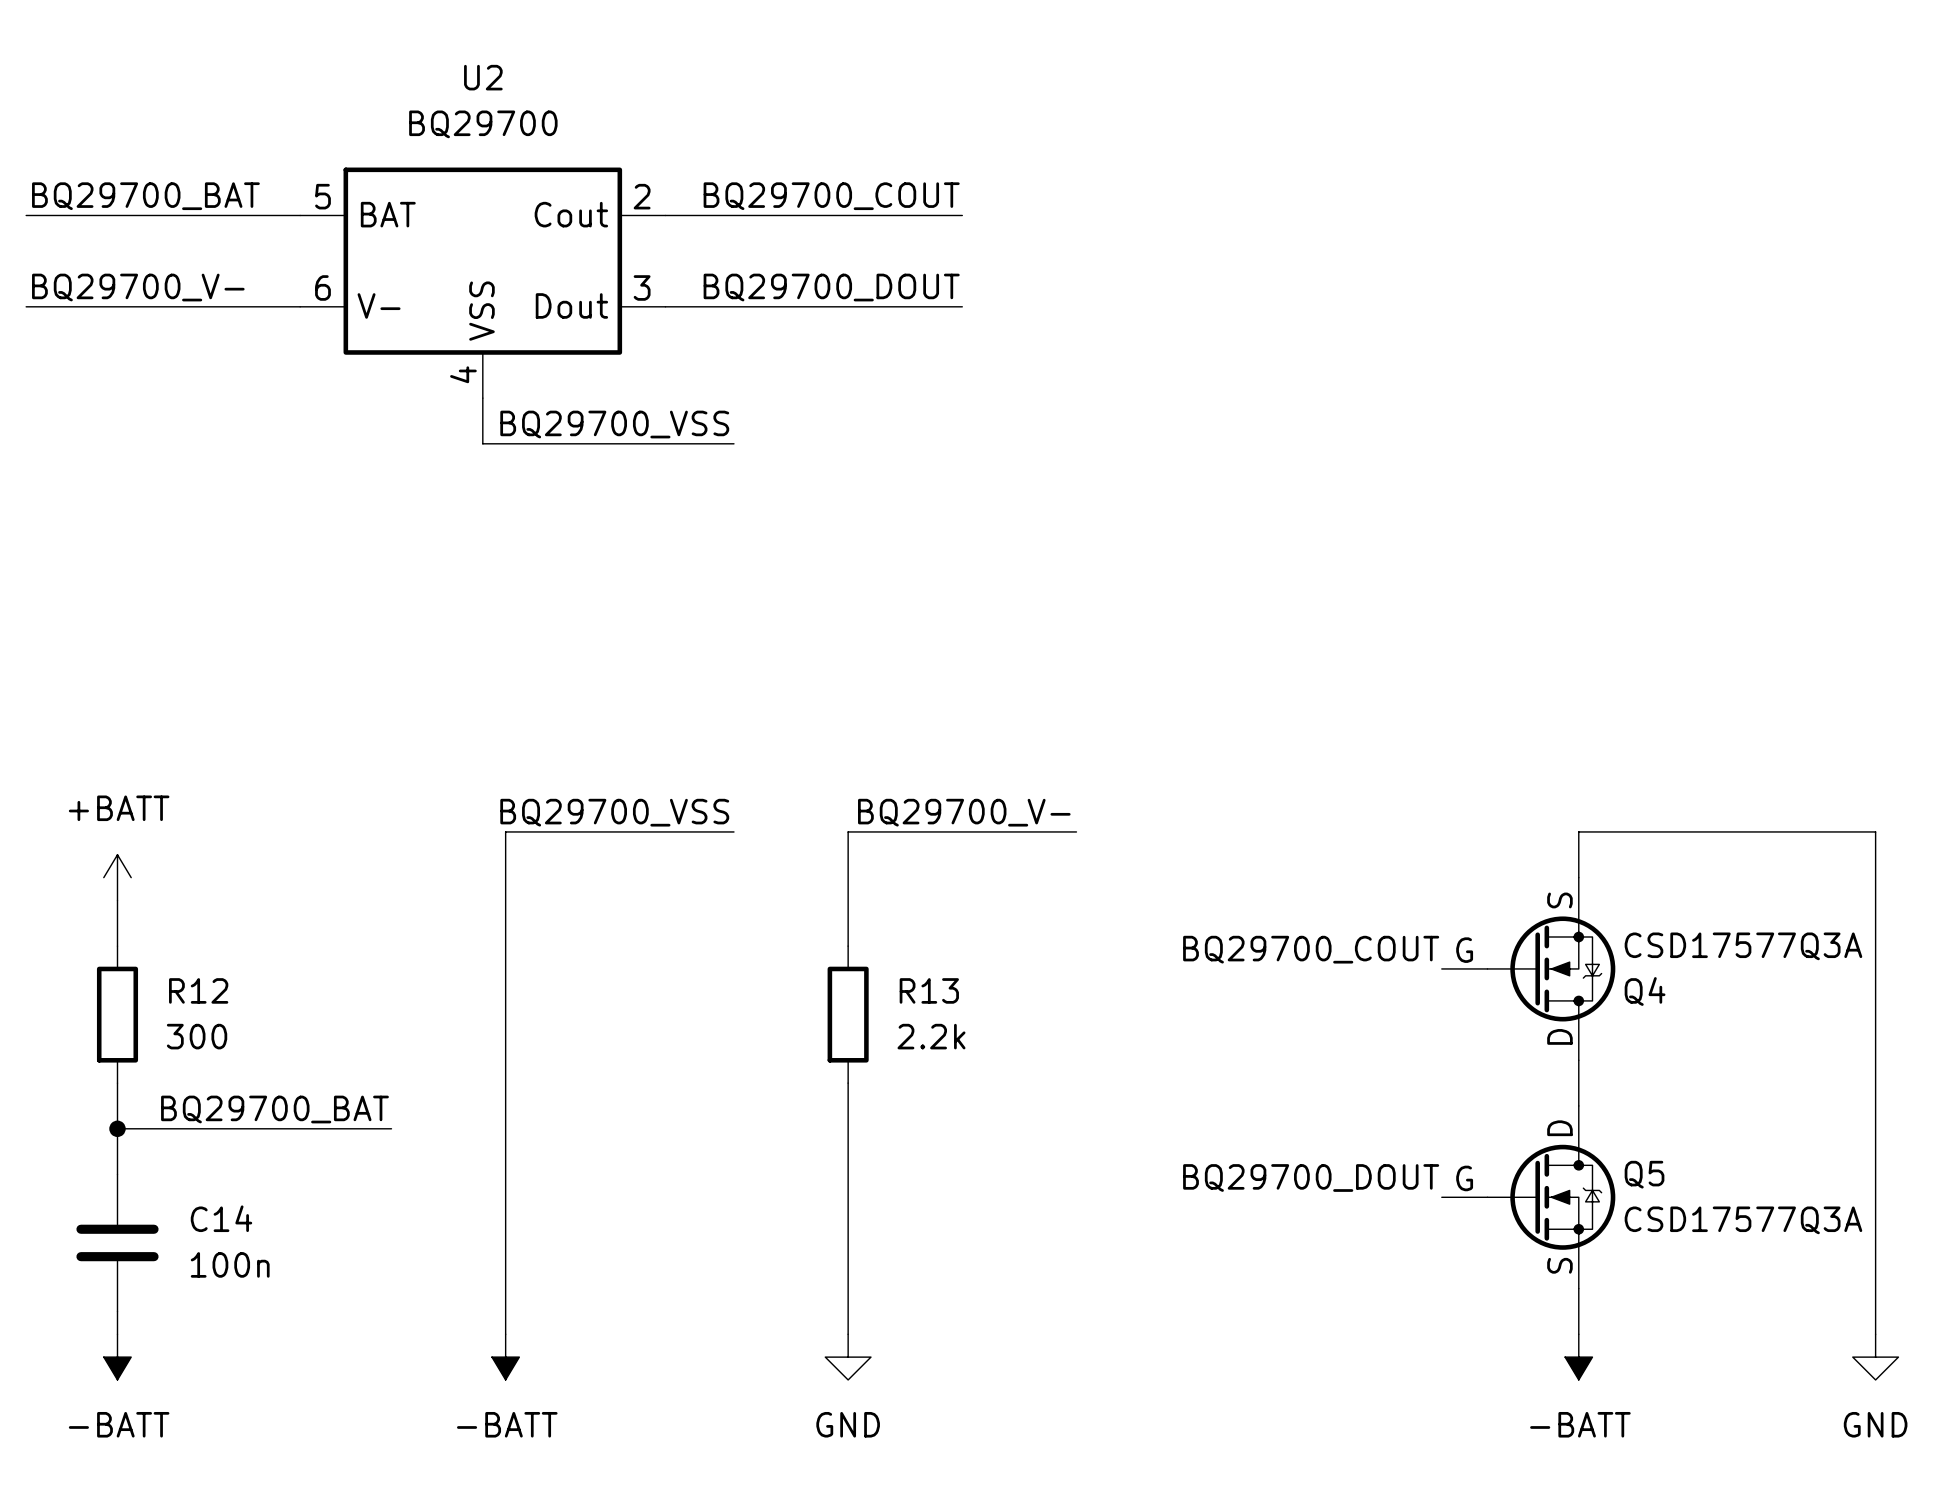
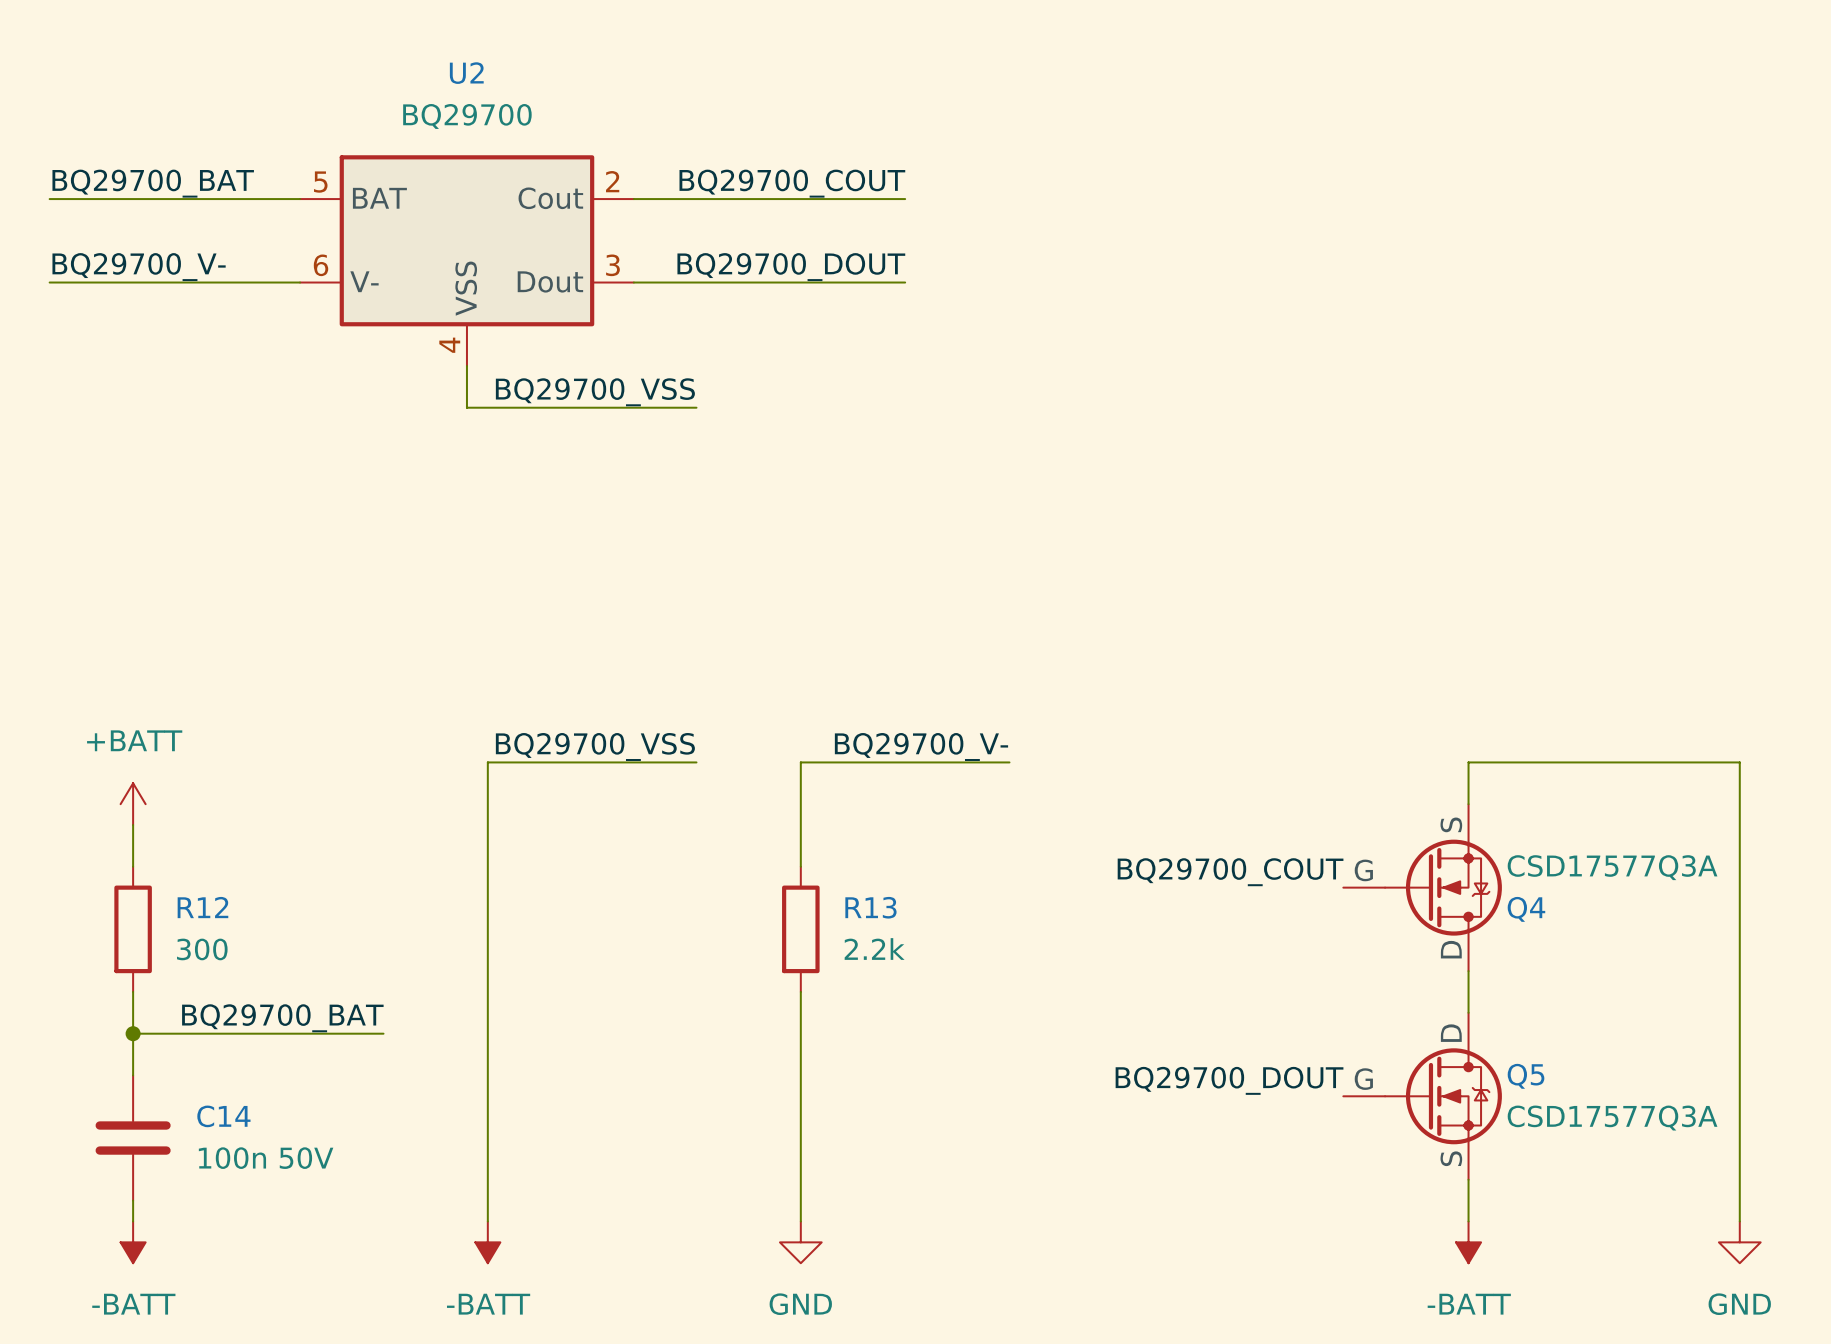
C14 value: 100n (230, 1264) -> 100n 50V (266, 1158)

